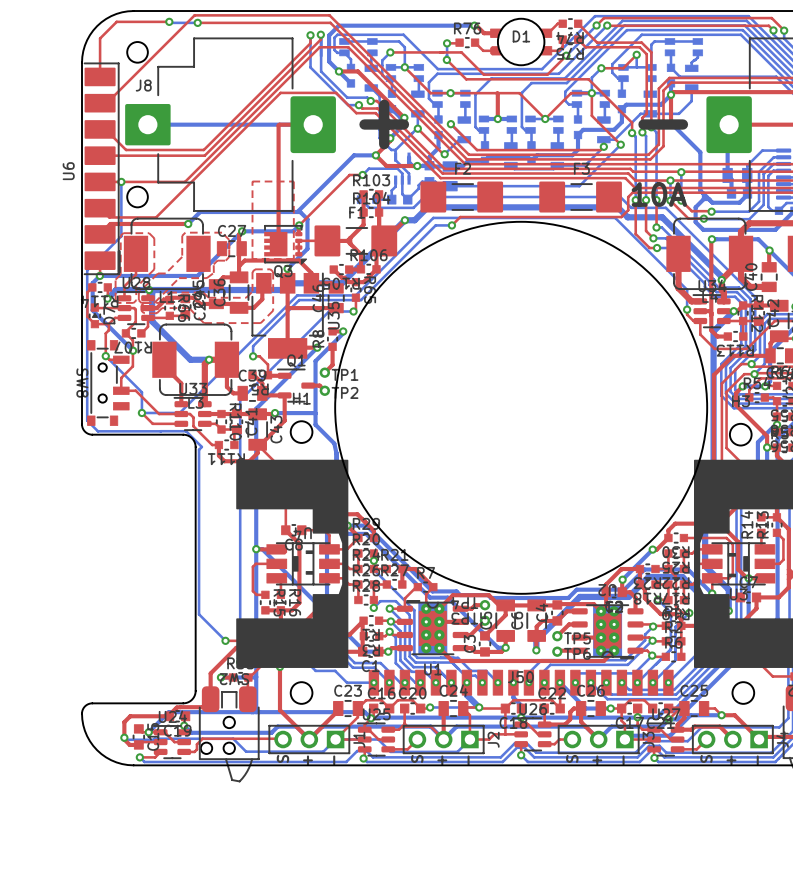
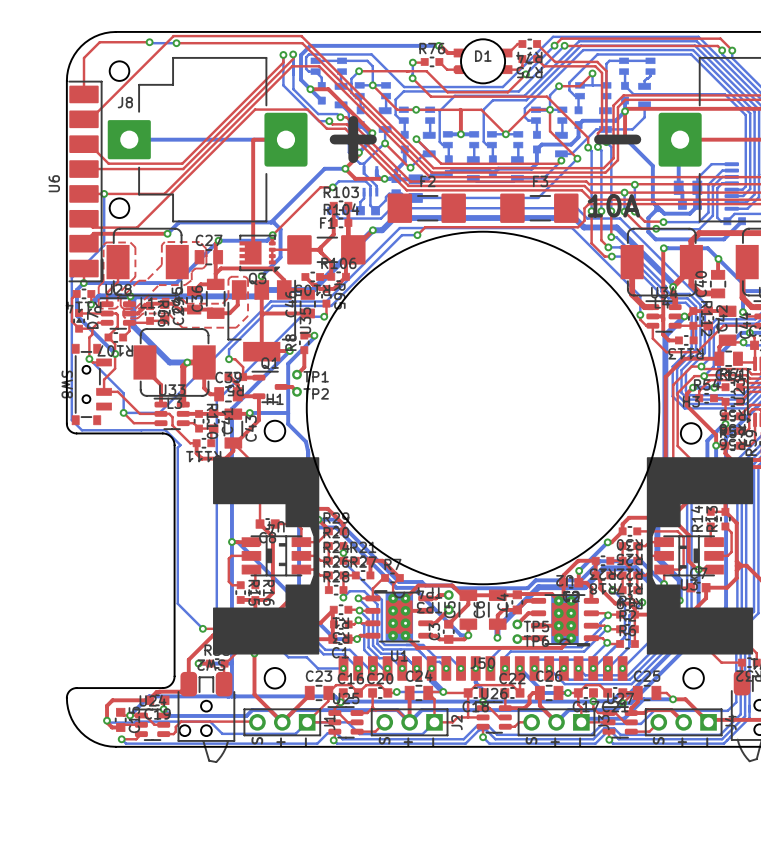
top zone outline: (252, 181) (293, 181) (293, 259) (252, 259) (252, 181) -> none

